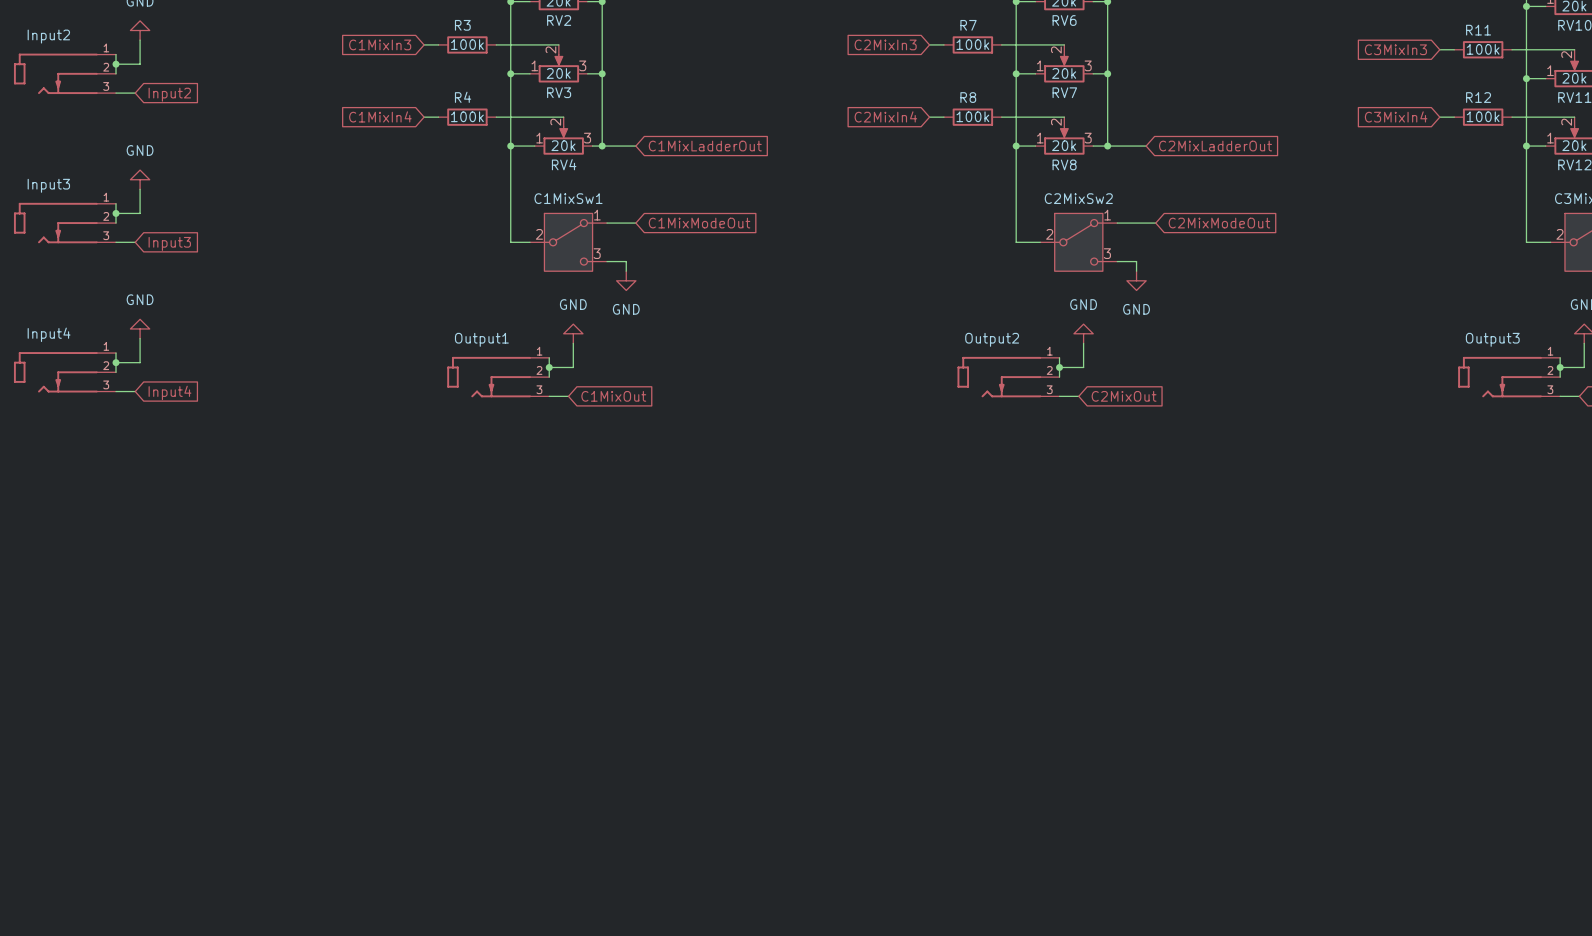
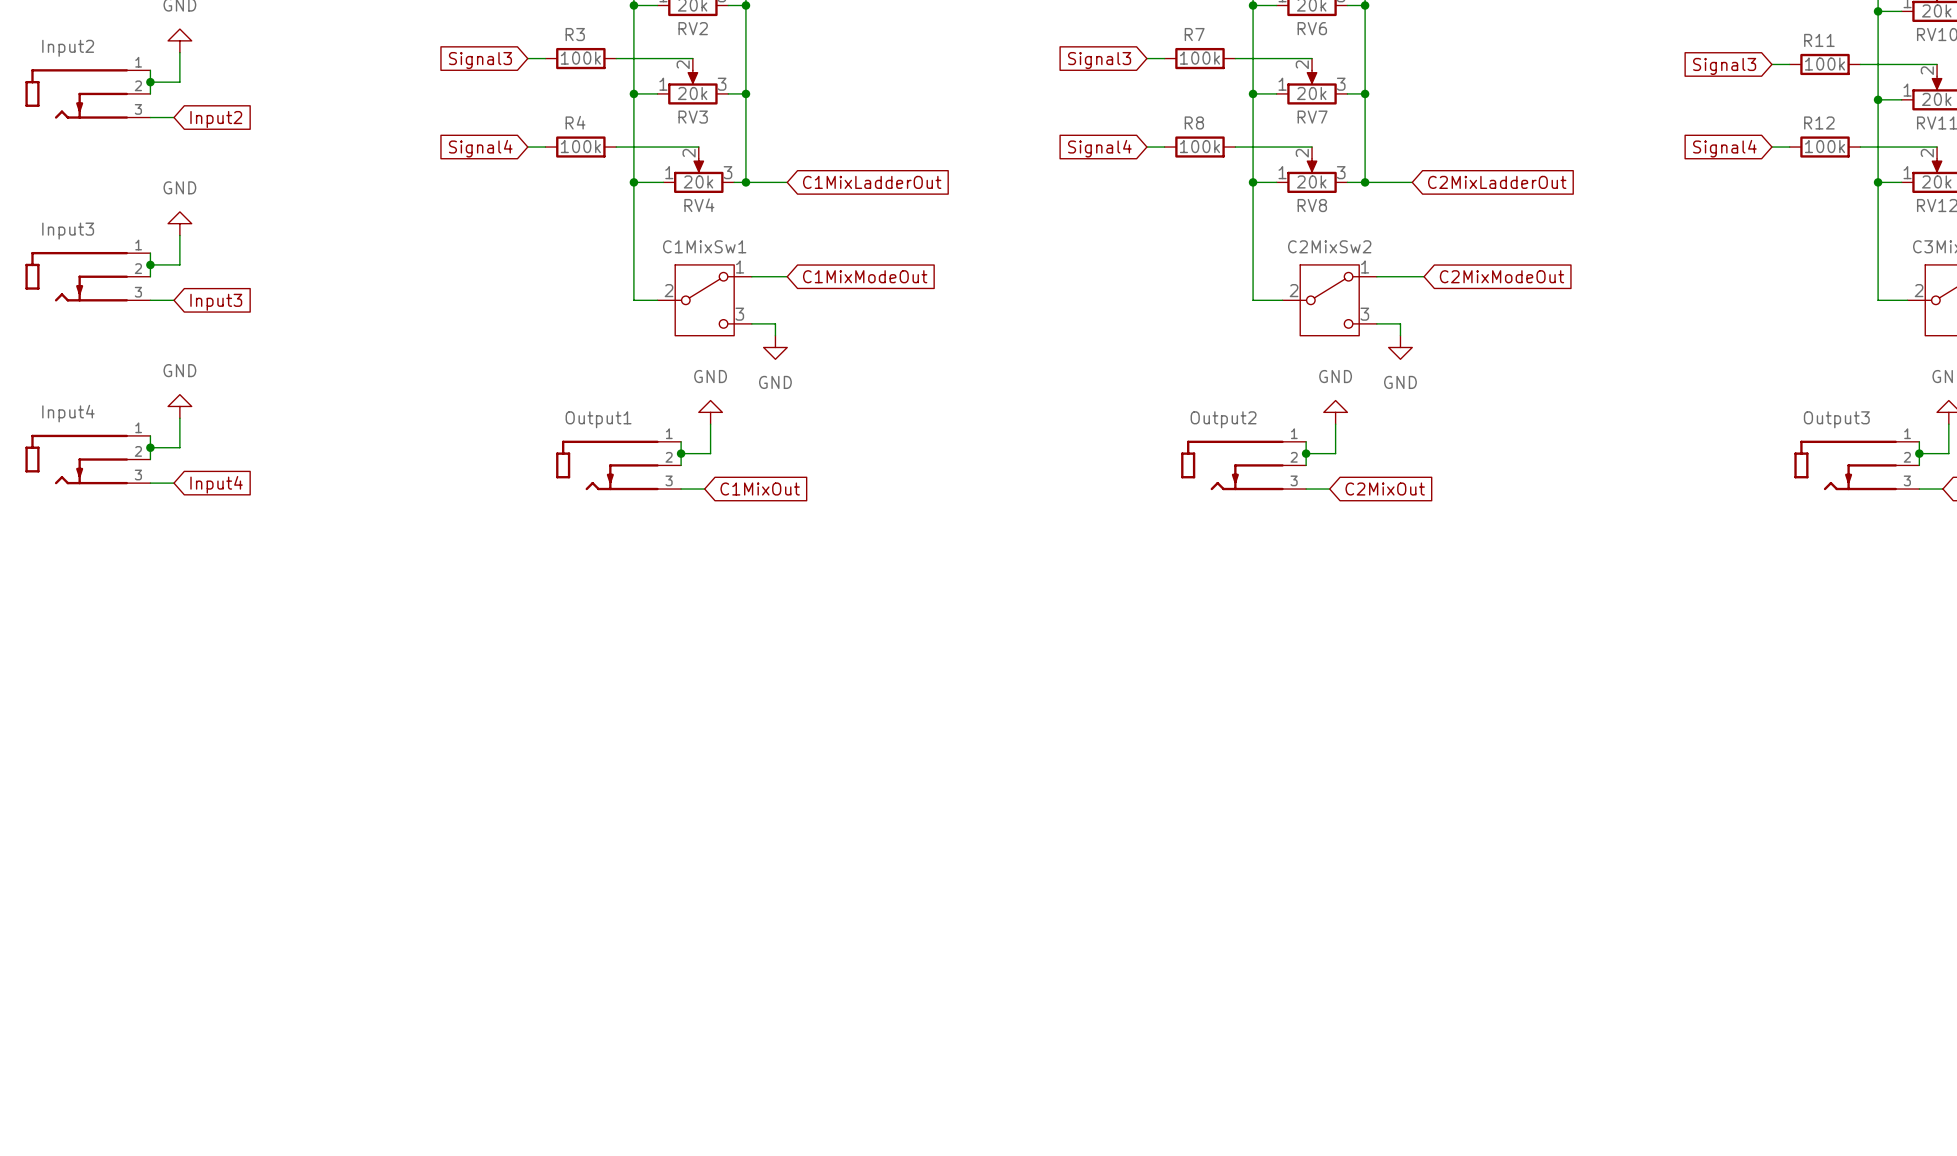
global label: C1MixIn3 (380, 44) -> Signal3 (480, 60)
global label: C2MixIn3 (885, 44) -> Signal3 (1099, 60)
global label: C3MixIn3 (1395, 49) -> Signal3 (1724, 66)
global label: C1MixIn4 (380, 116) -> Signal4 (480, 148)
global label: C2MixIn4 (885, 116) -> Signal4 (1099, 148)
global label: C3MixIn4 (1396, 116) -> Signal4 (1724, 148)

